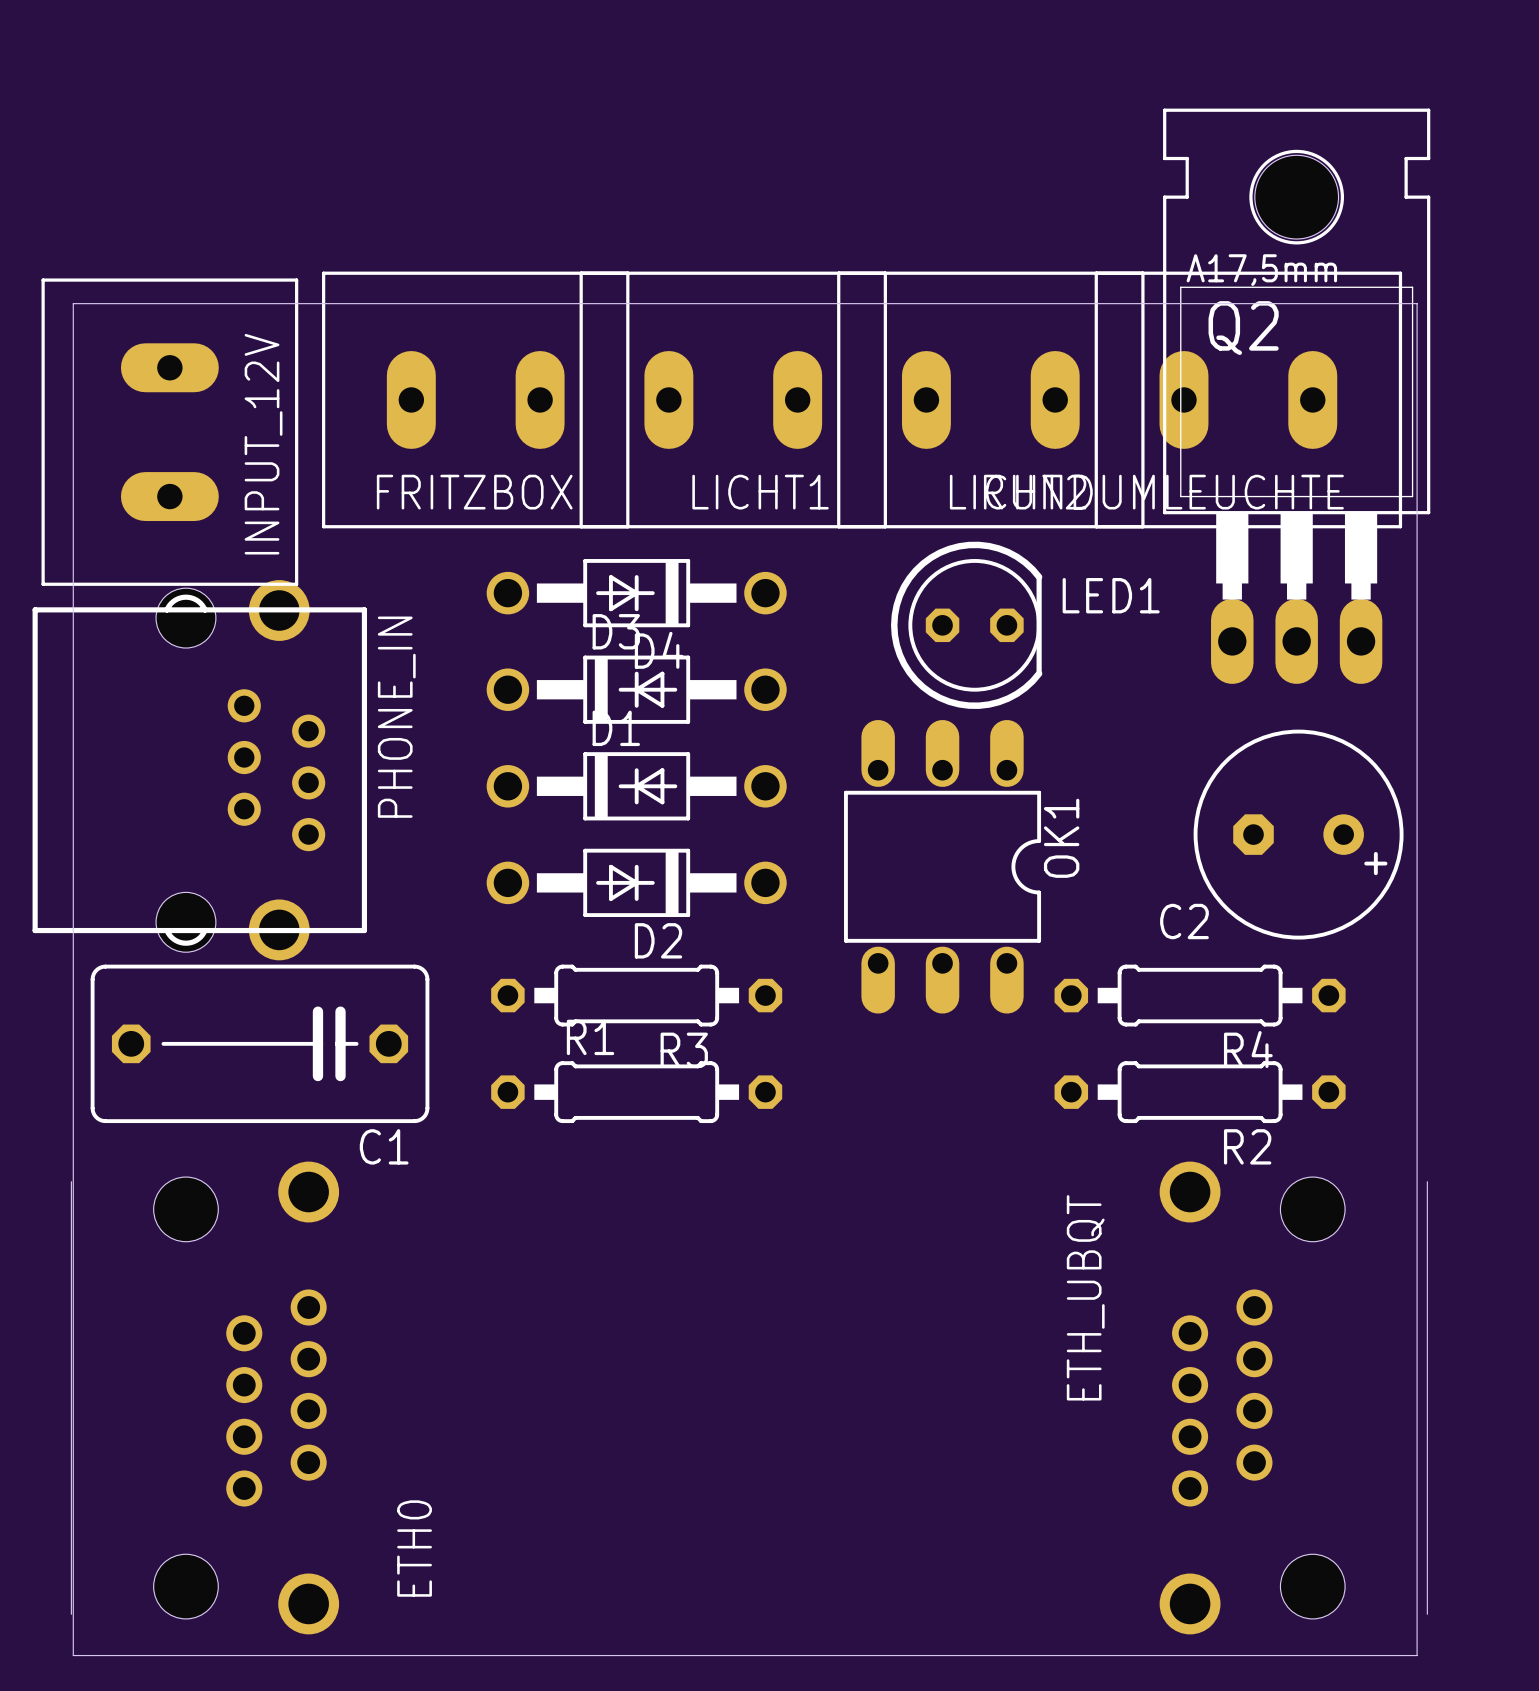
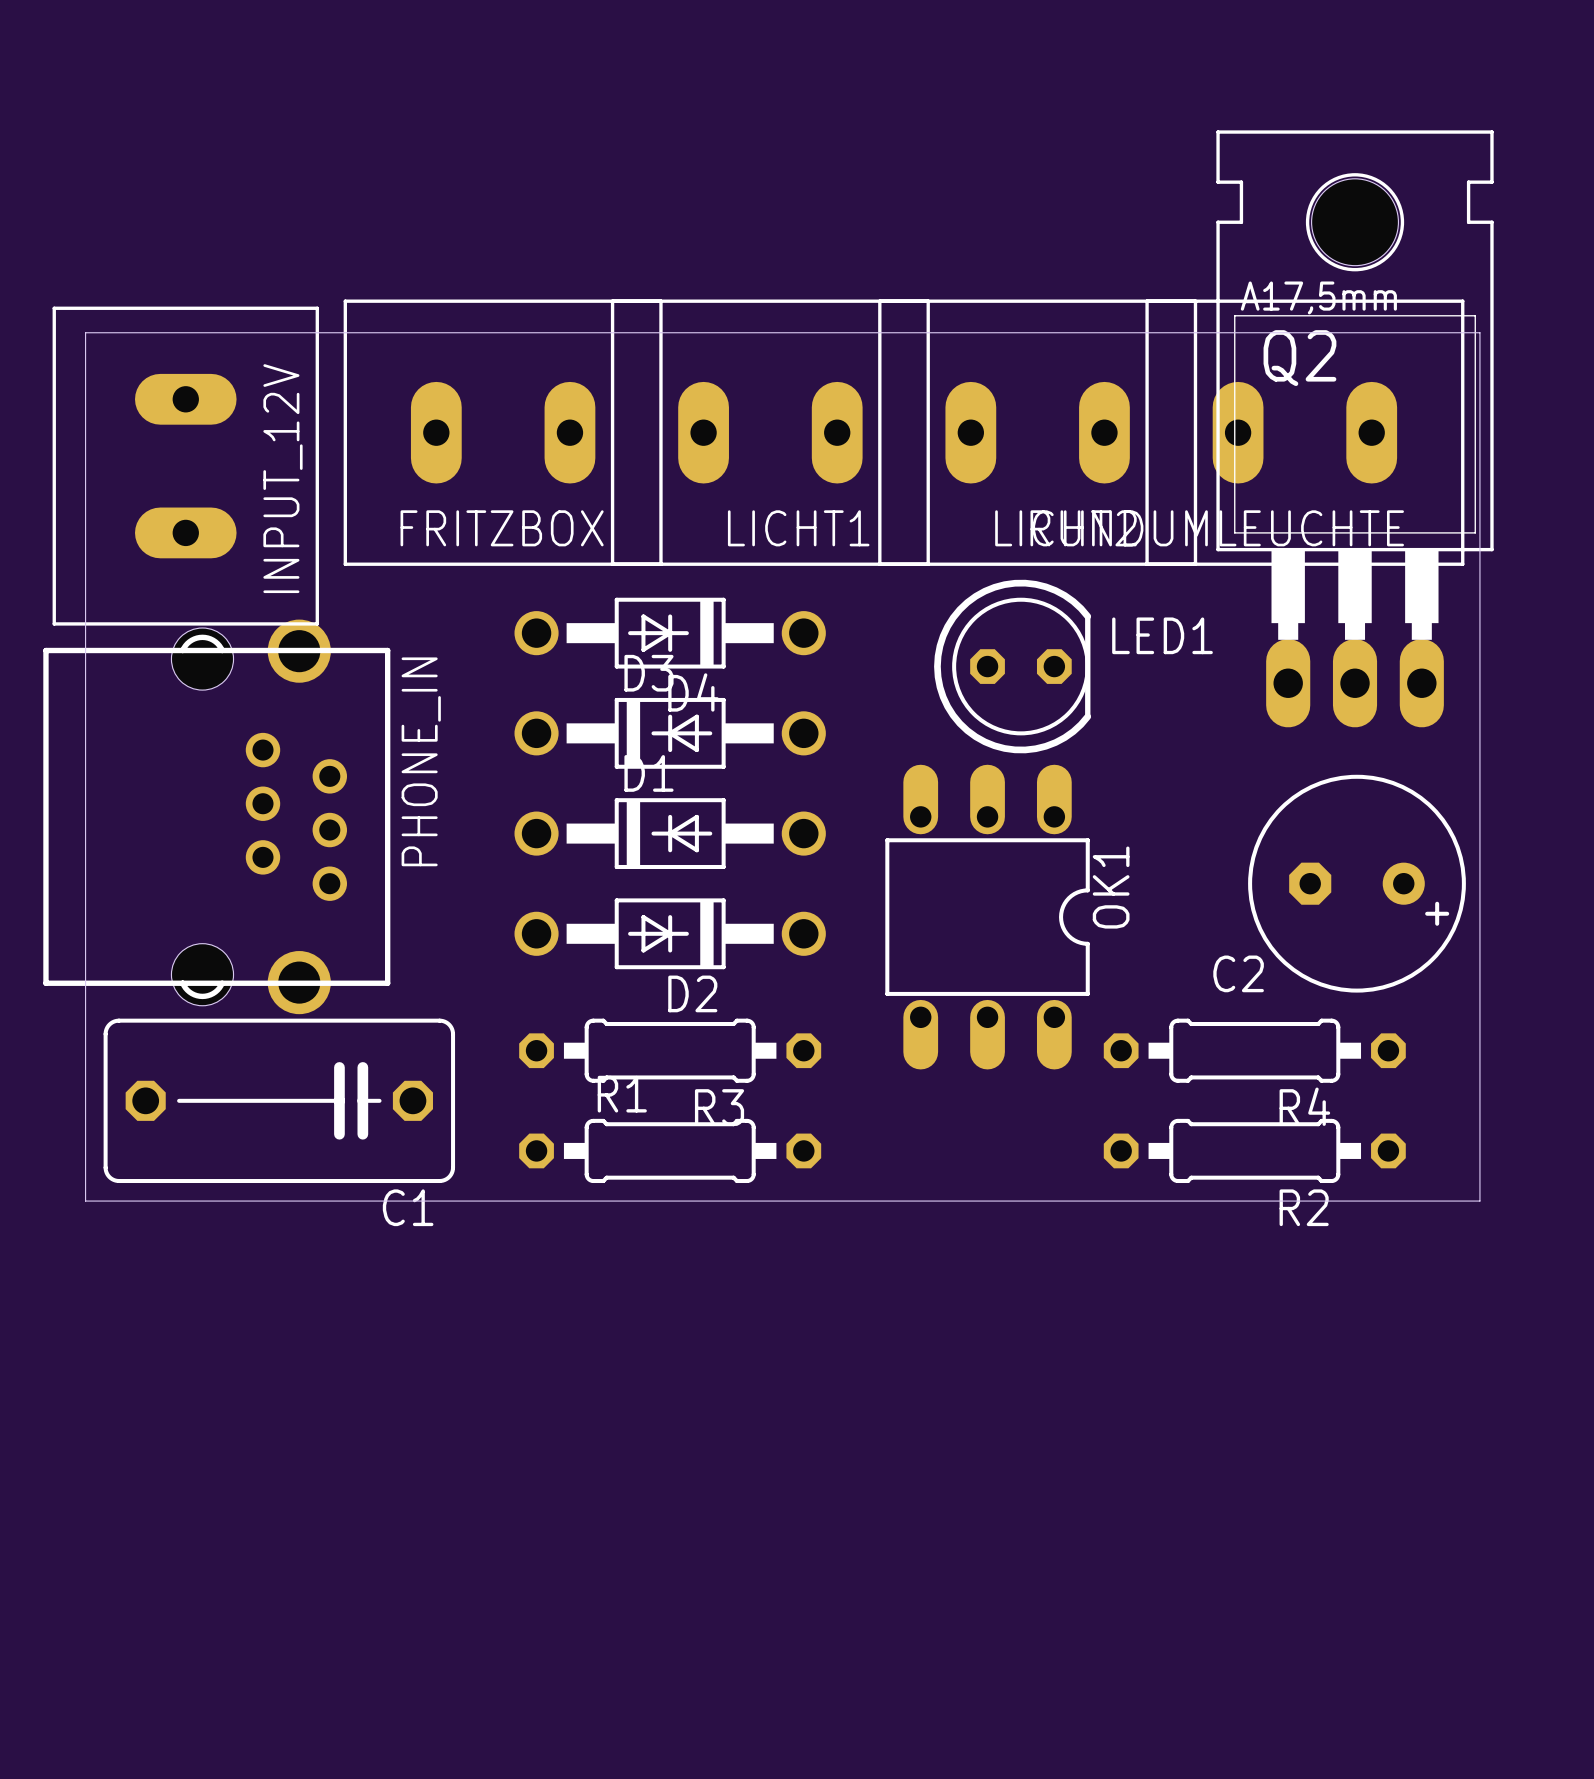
board edge: (73, 1140) (73, 1655) (1417, 1655) (1417, 1140) -> (85, 1201) (1479, 1201)
ETH0: (205, 1397) -> none
ETH_UBQT: (1293, 1397) -> none

